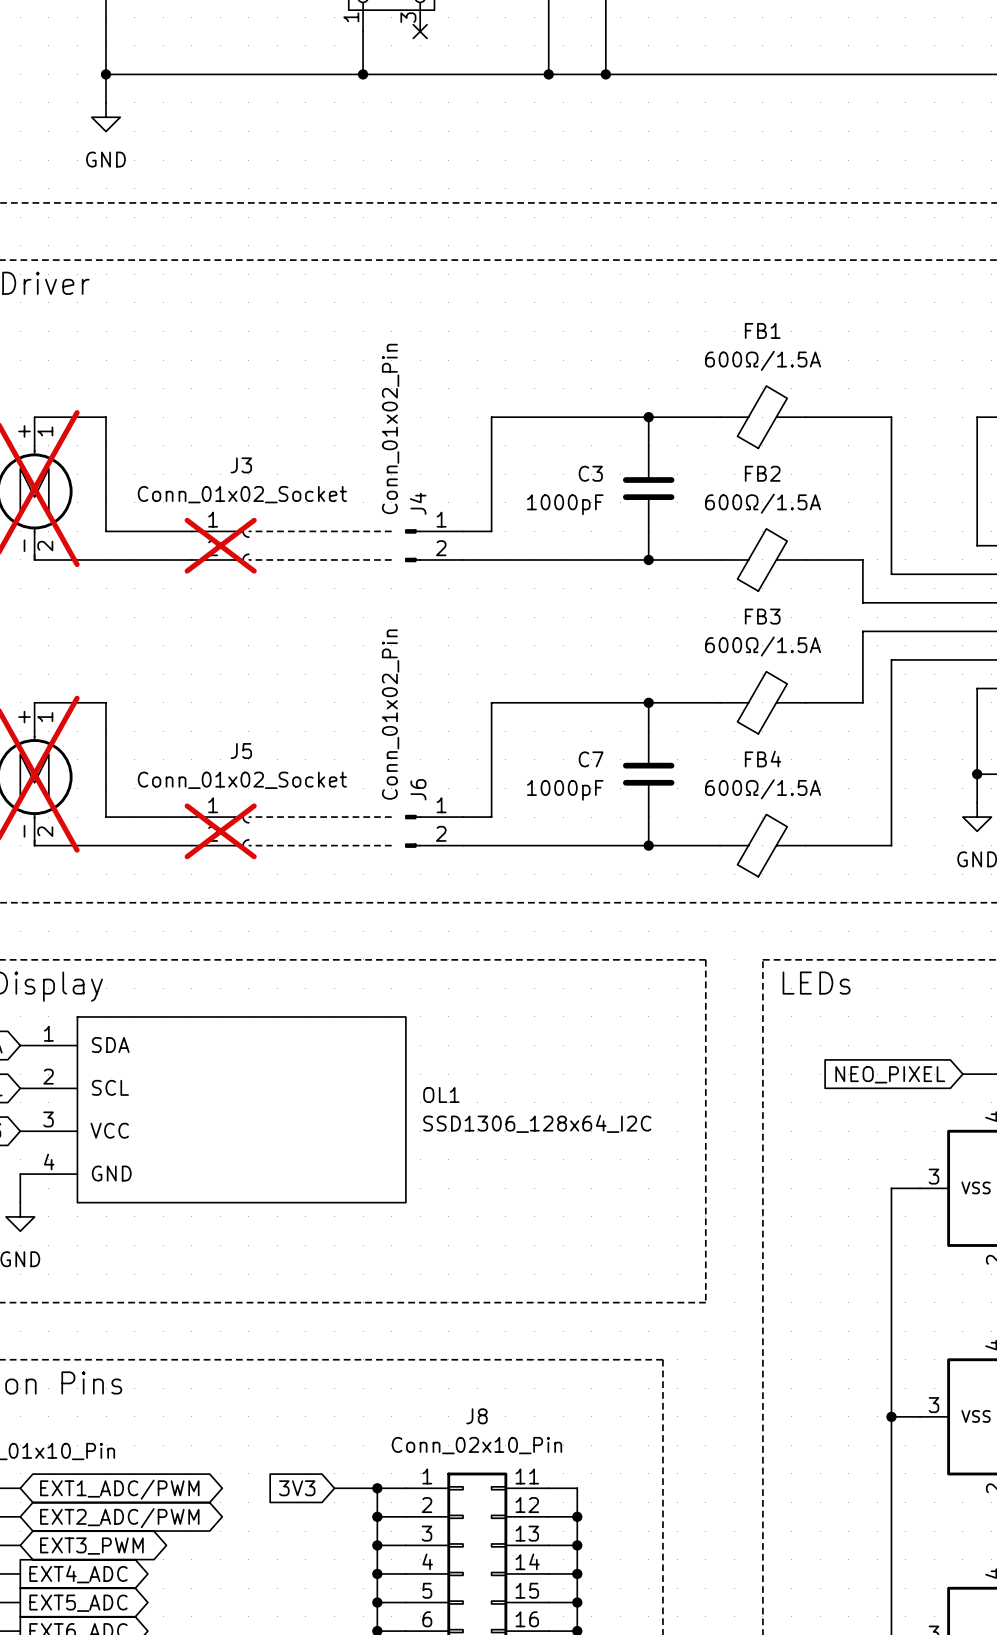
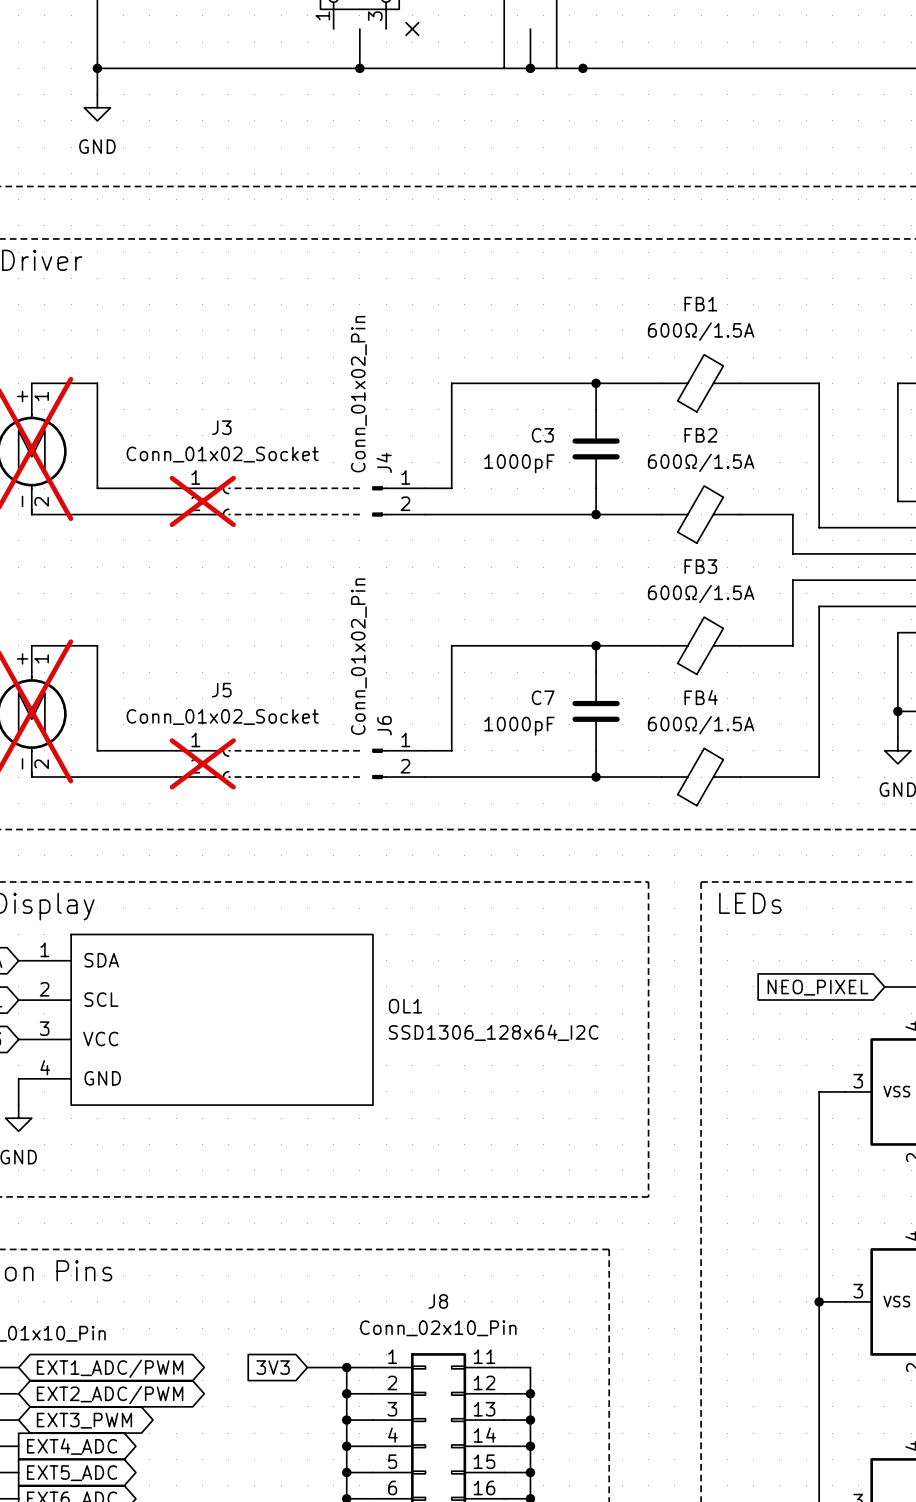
wire: (363, 31) (363, 74) -> (359, 29) (359, 68)
no-connect mark position: (420, 31) -> (412, 29)
wire: none -> (530, 29) (530, 68)
junction position: (363, 74) -> (359, 68)
junction: (548, 74) -> none
junction: none -> (530, 68)
junction: (605, 74) -> none
junction: none -> (582, 68)

